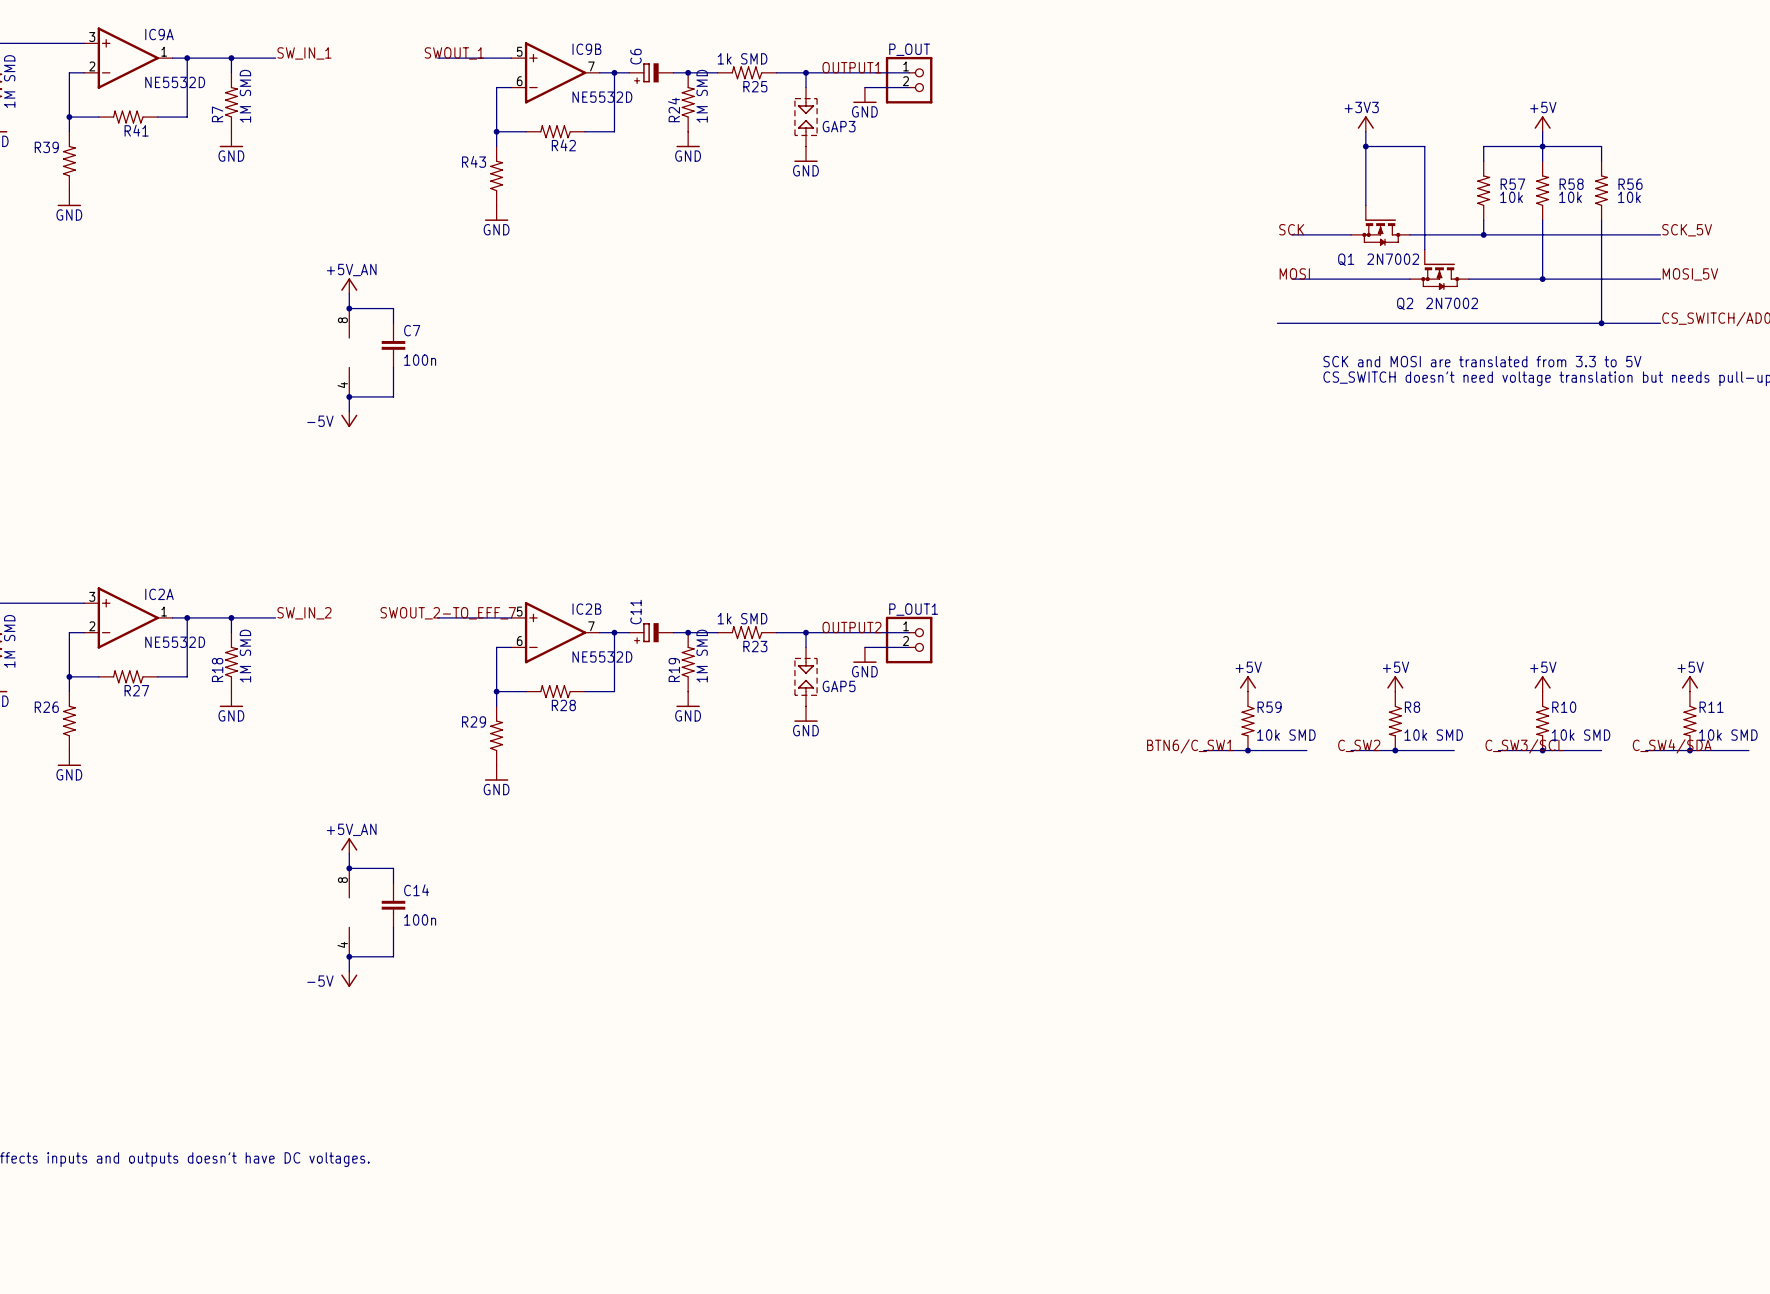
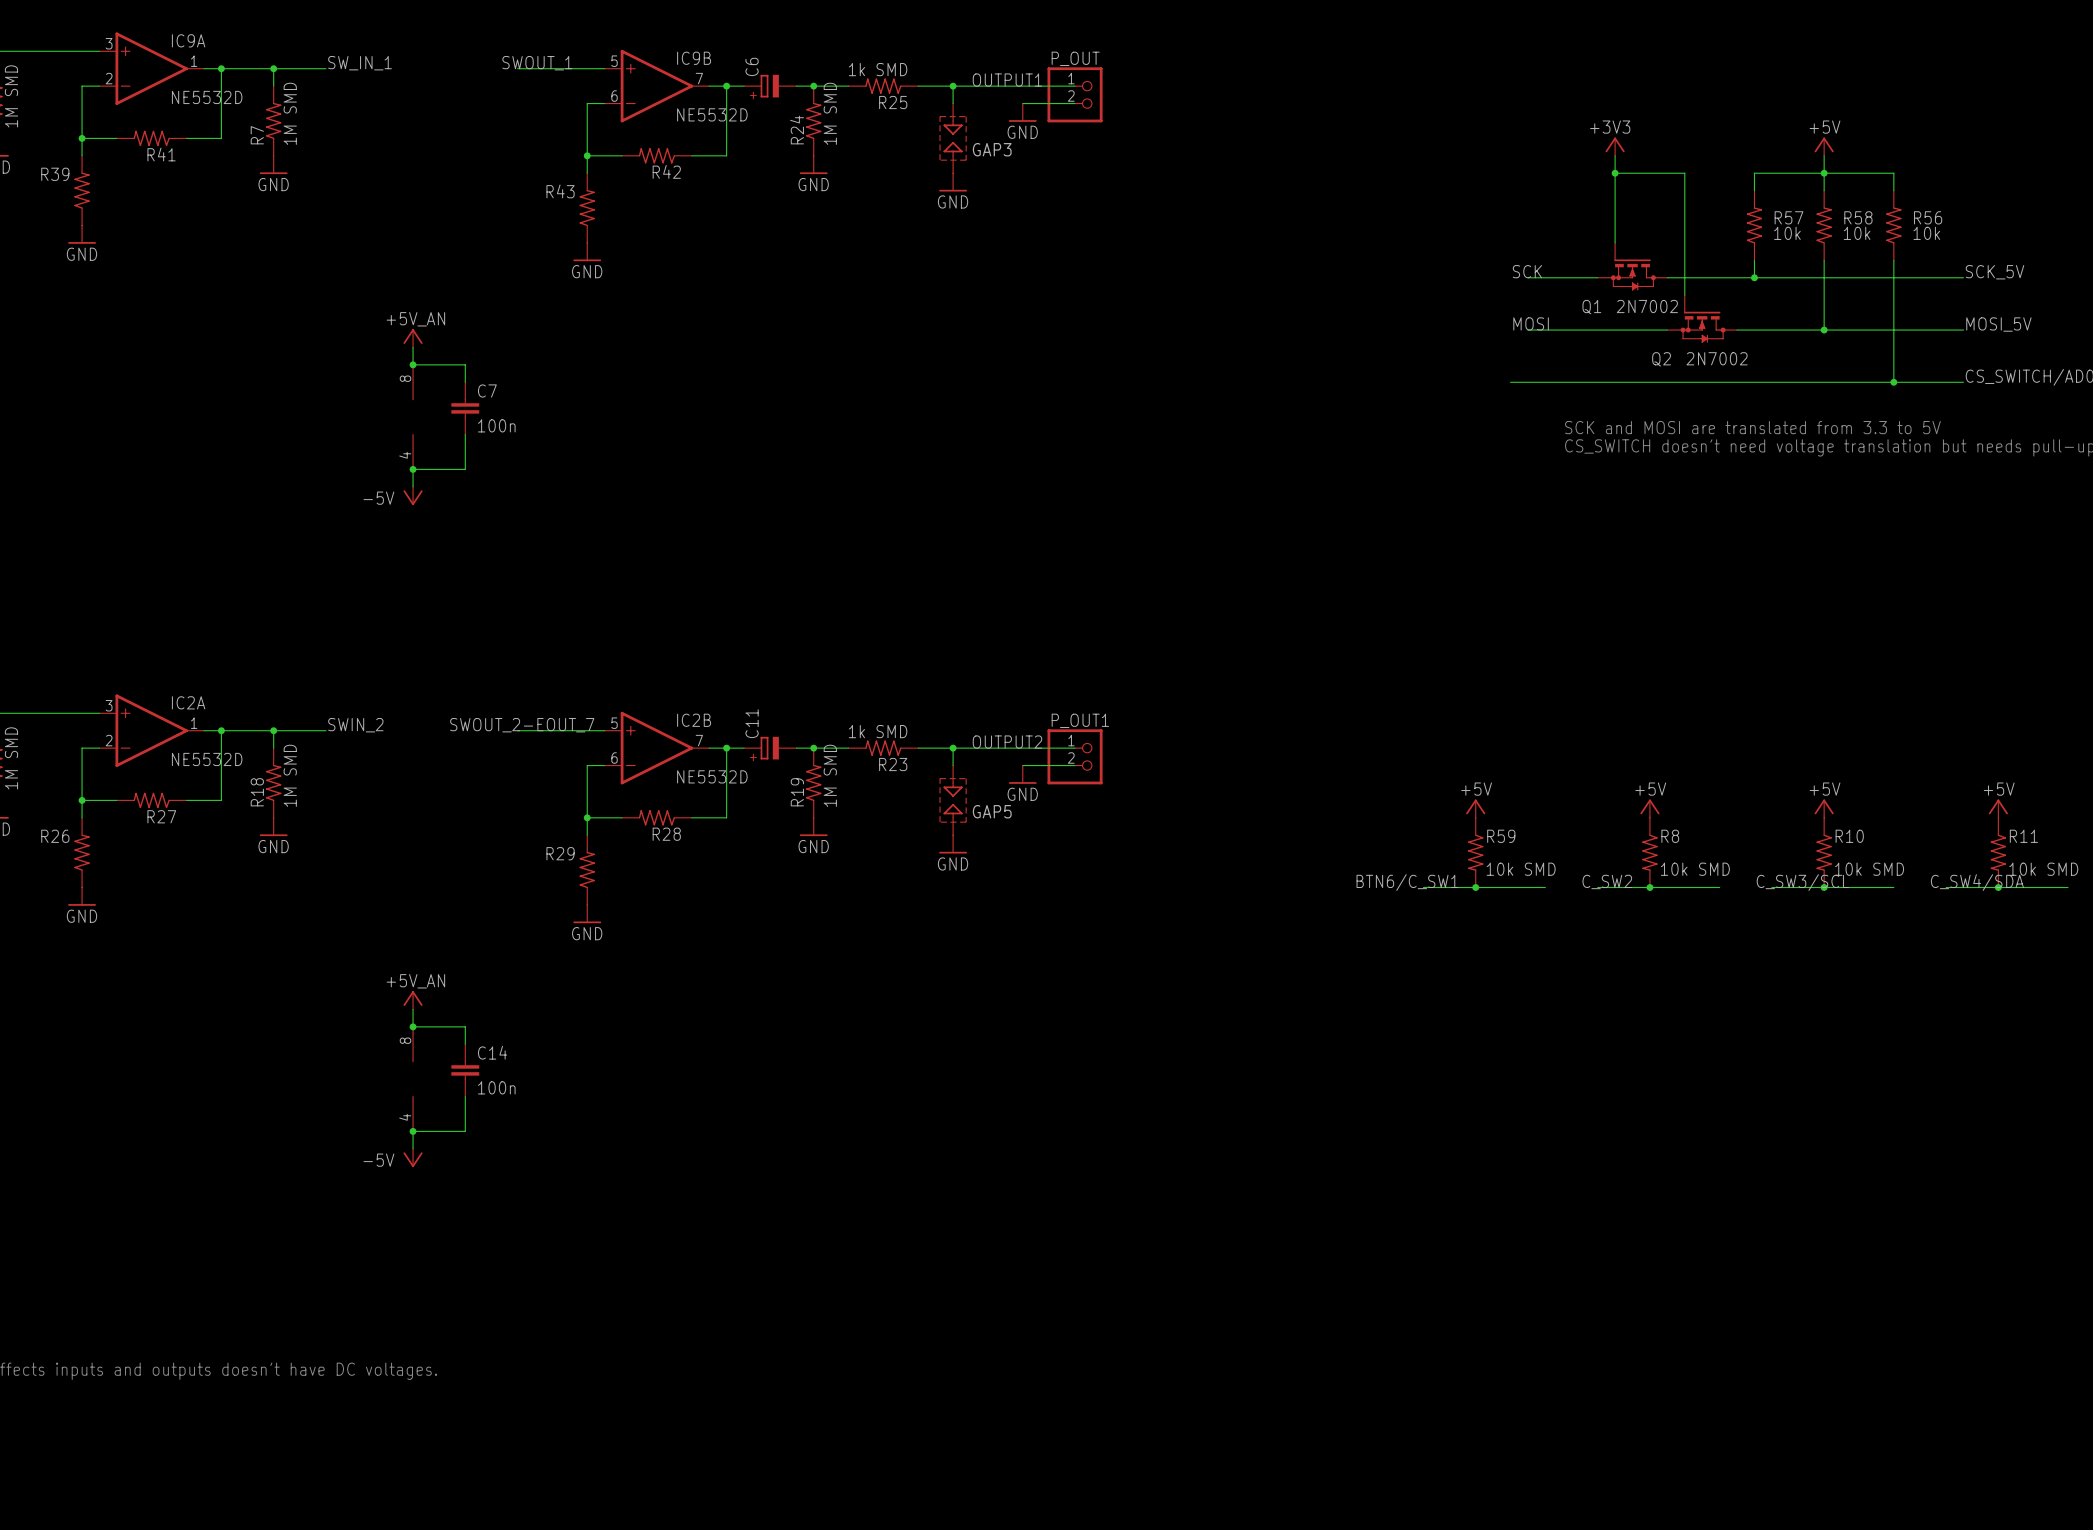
label: SW_IN_2 (304, 613) -> SWIN_2 (355, 725)
label: SWOUT_2-TO_EFF_7 (448, 613) -> SWOUT_2-EOUT_7 (522, 725)

